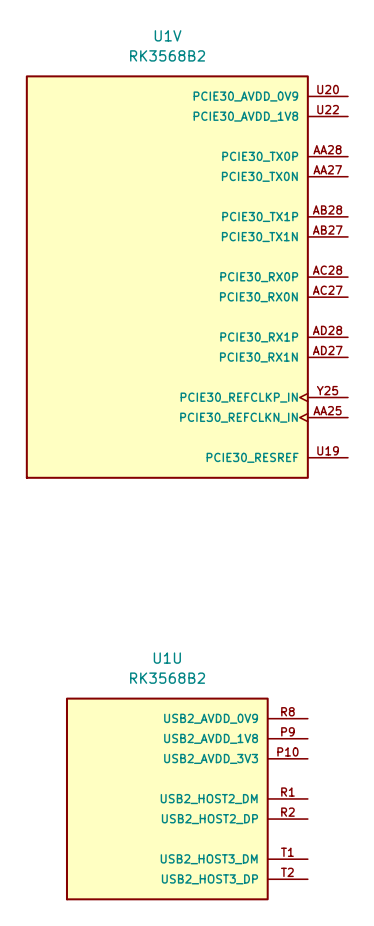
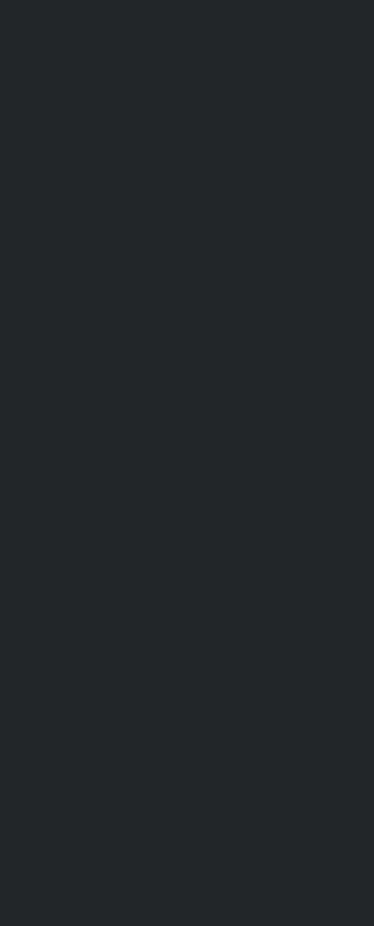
U1V: RK3568B2 (186, 277) -> none
U1U: RK3568B2 (186, 798) -> none

